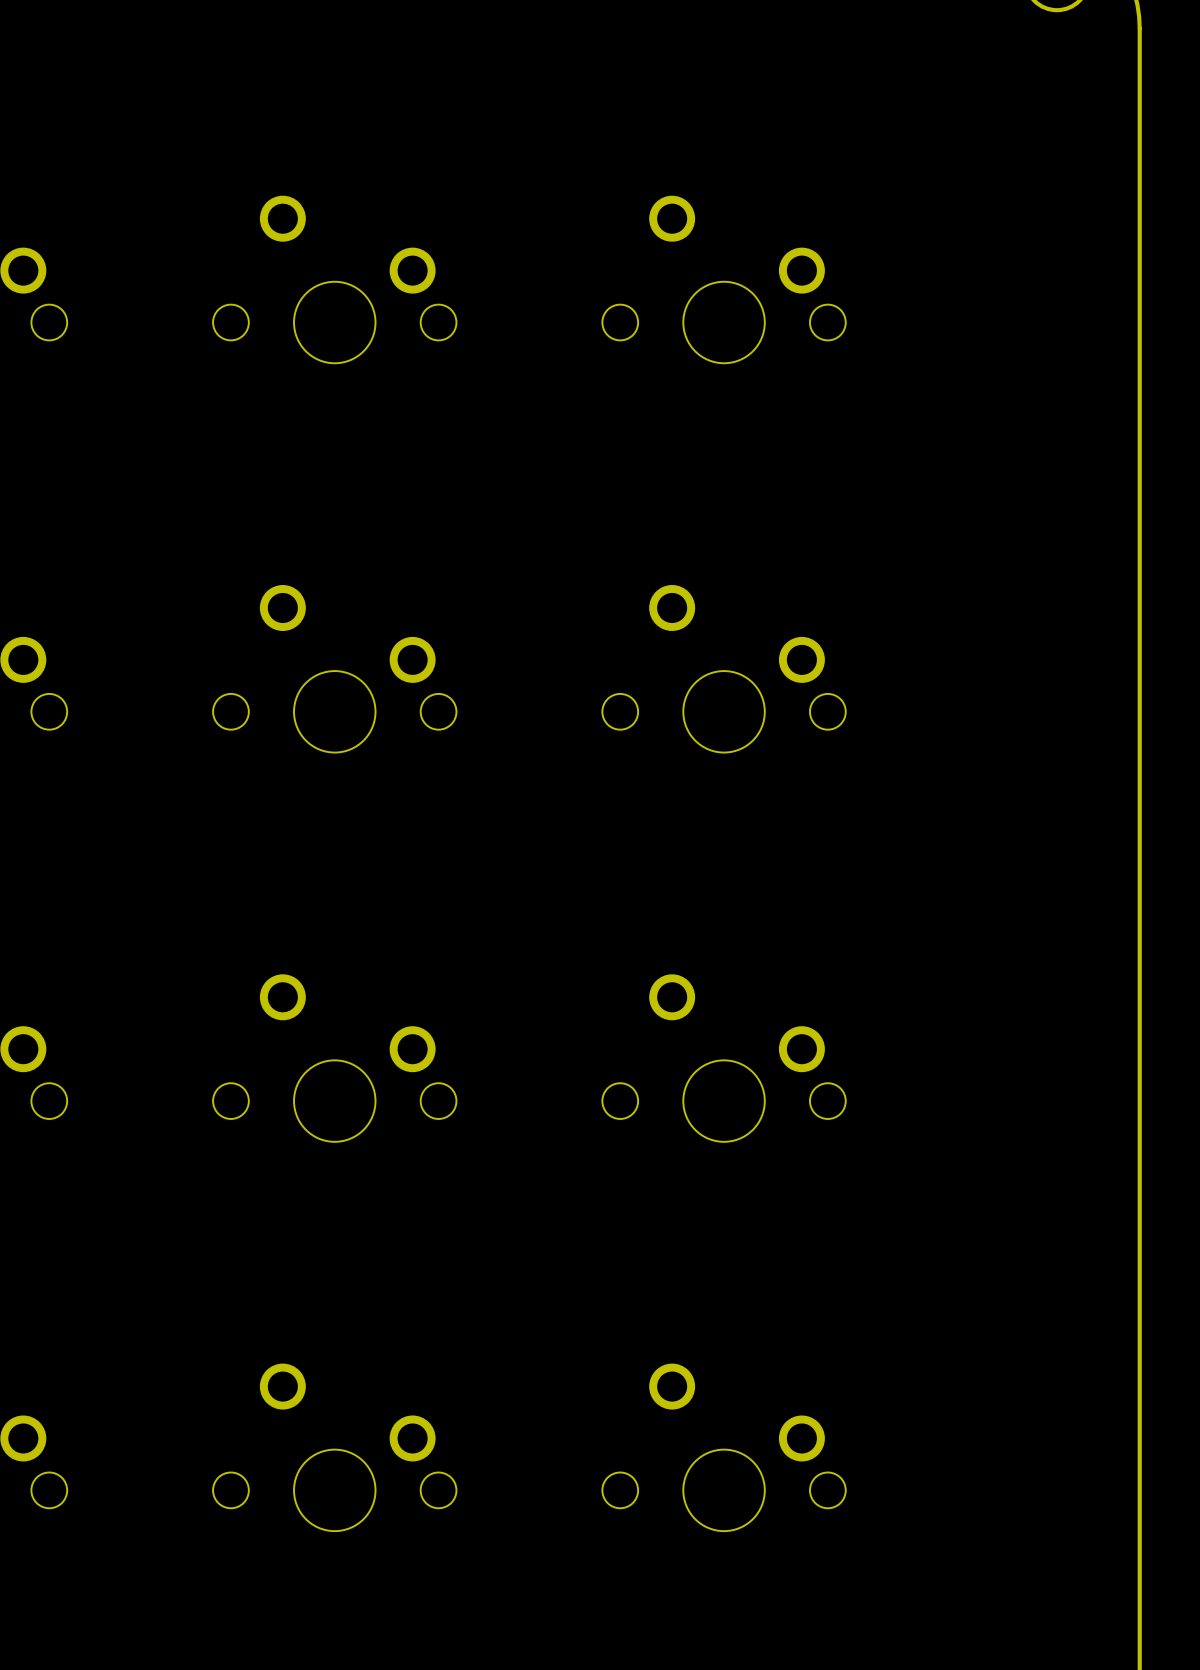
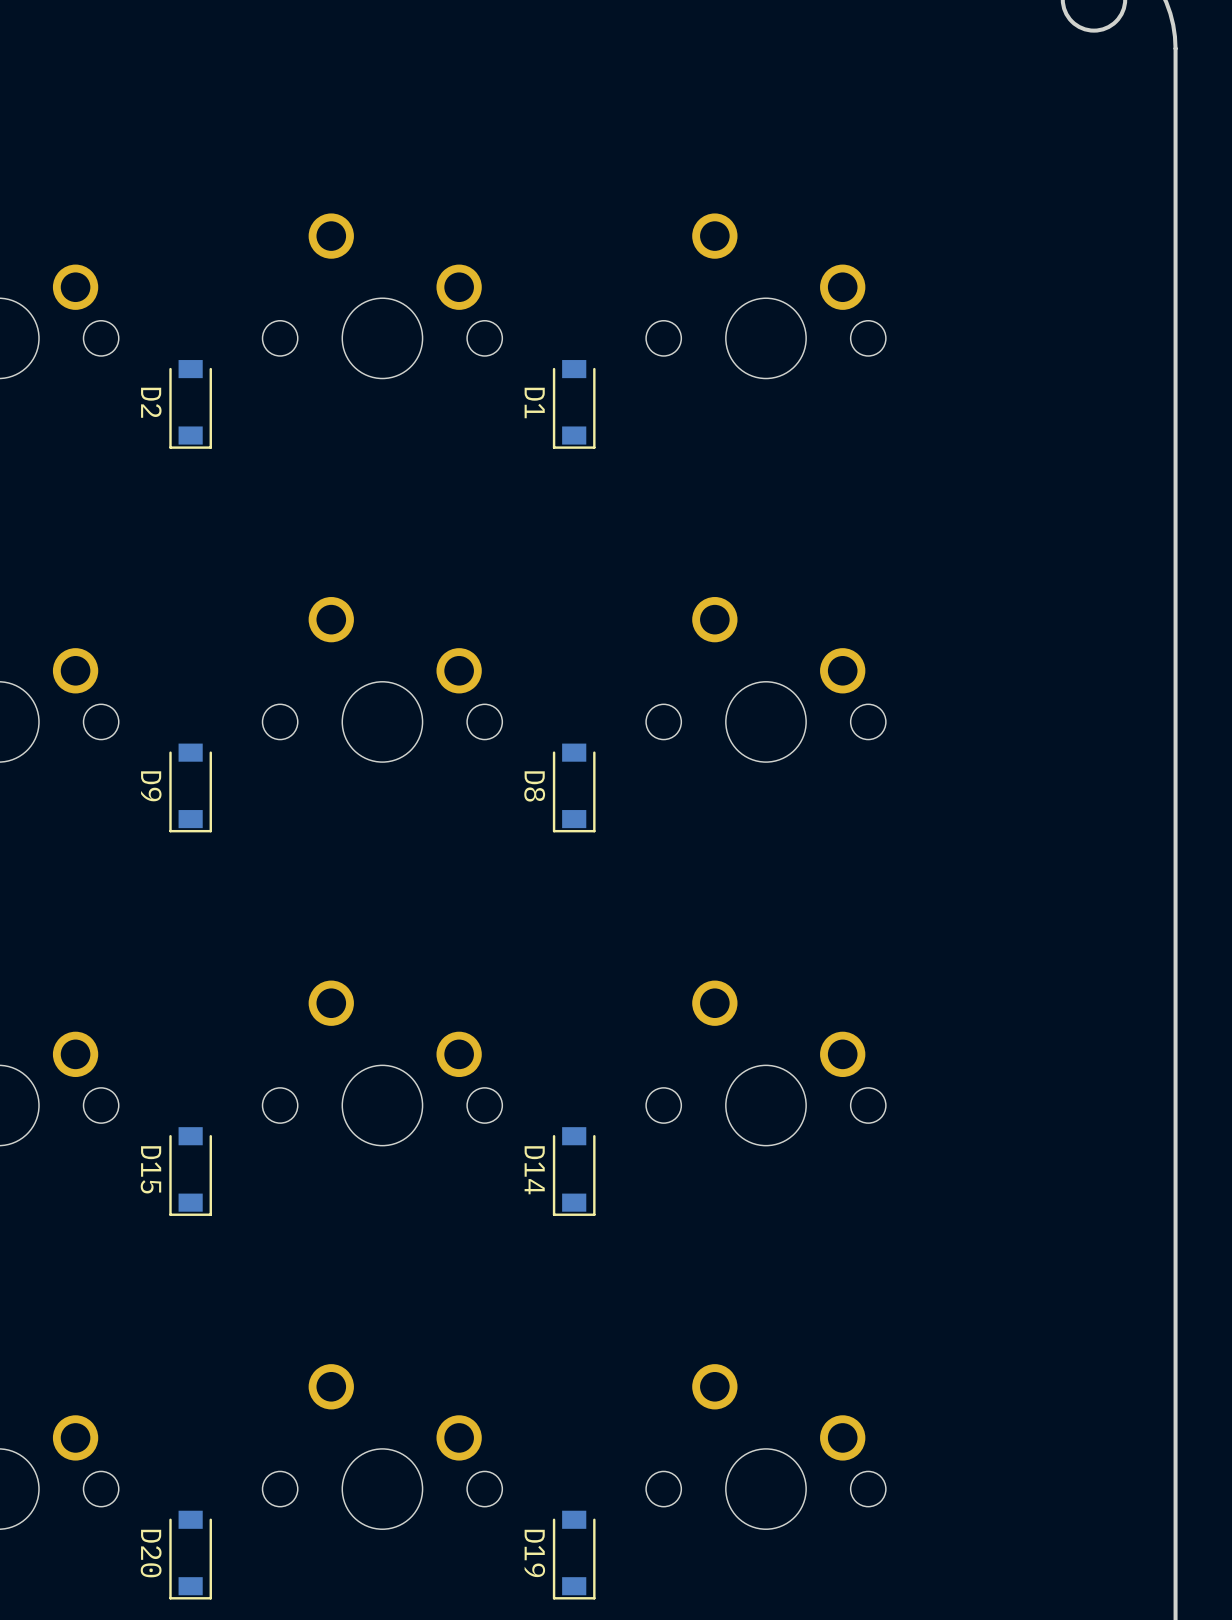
D2: none -> (190, 404)
D1: none -> (574, 404)
D9: none -> (190, 787)
D8: none -> (574, 787)
D15: none -> (190, 1171)
D14: none -> (574, 1171)
D20: none -> (190, 1555)
D19: none -> (574, 1555)

